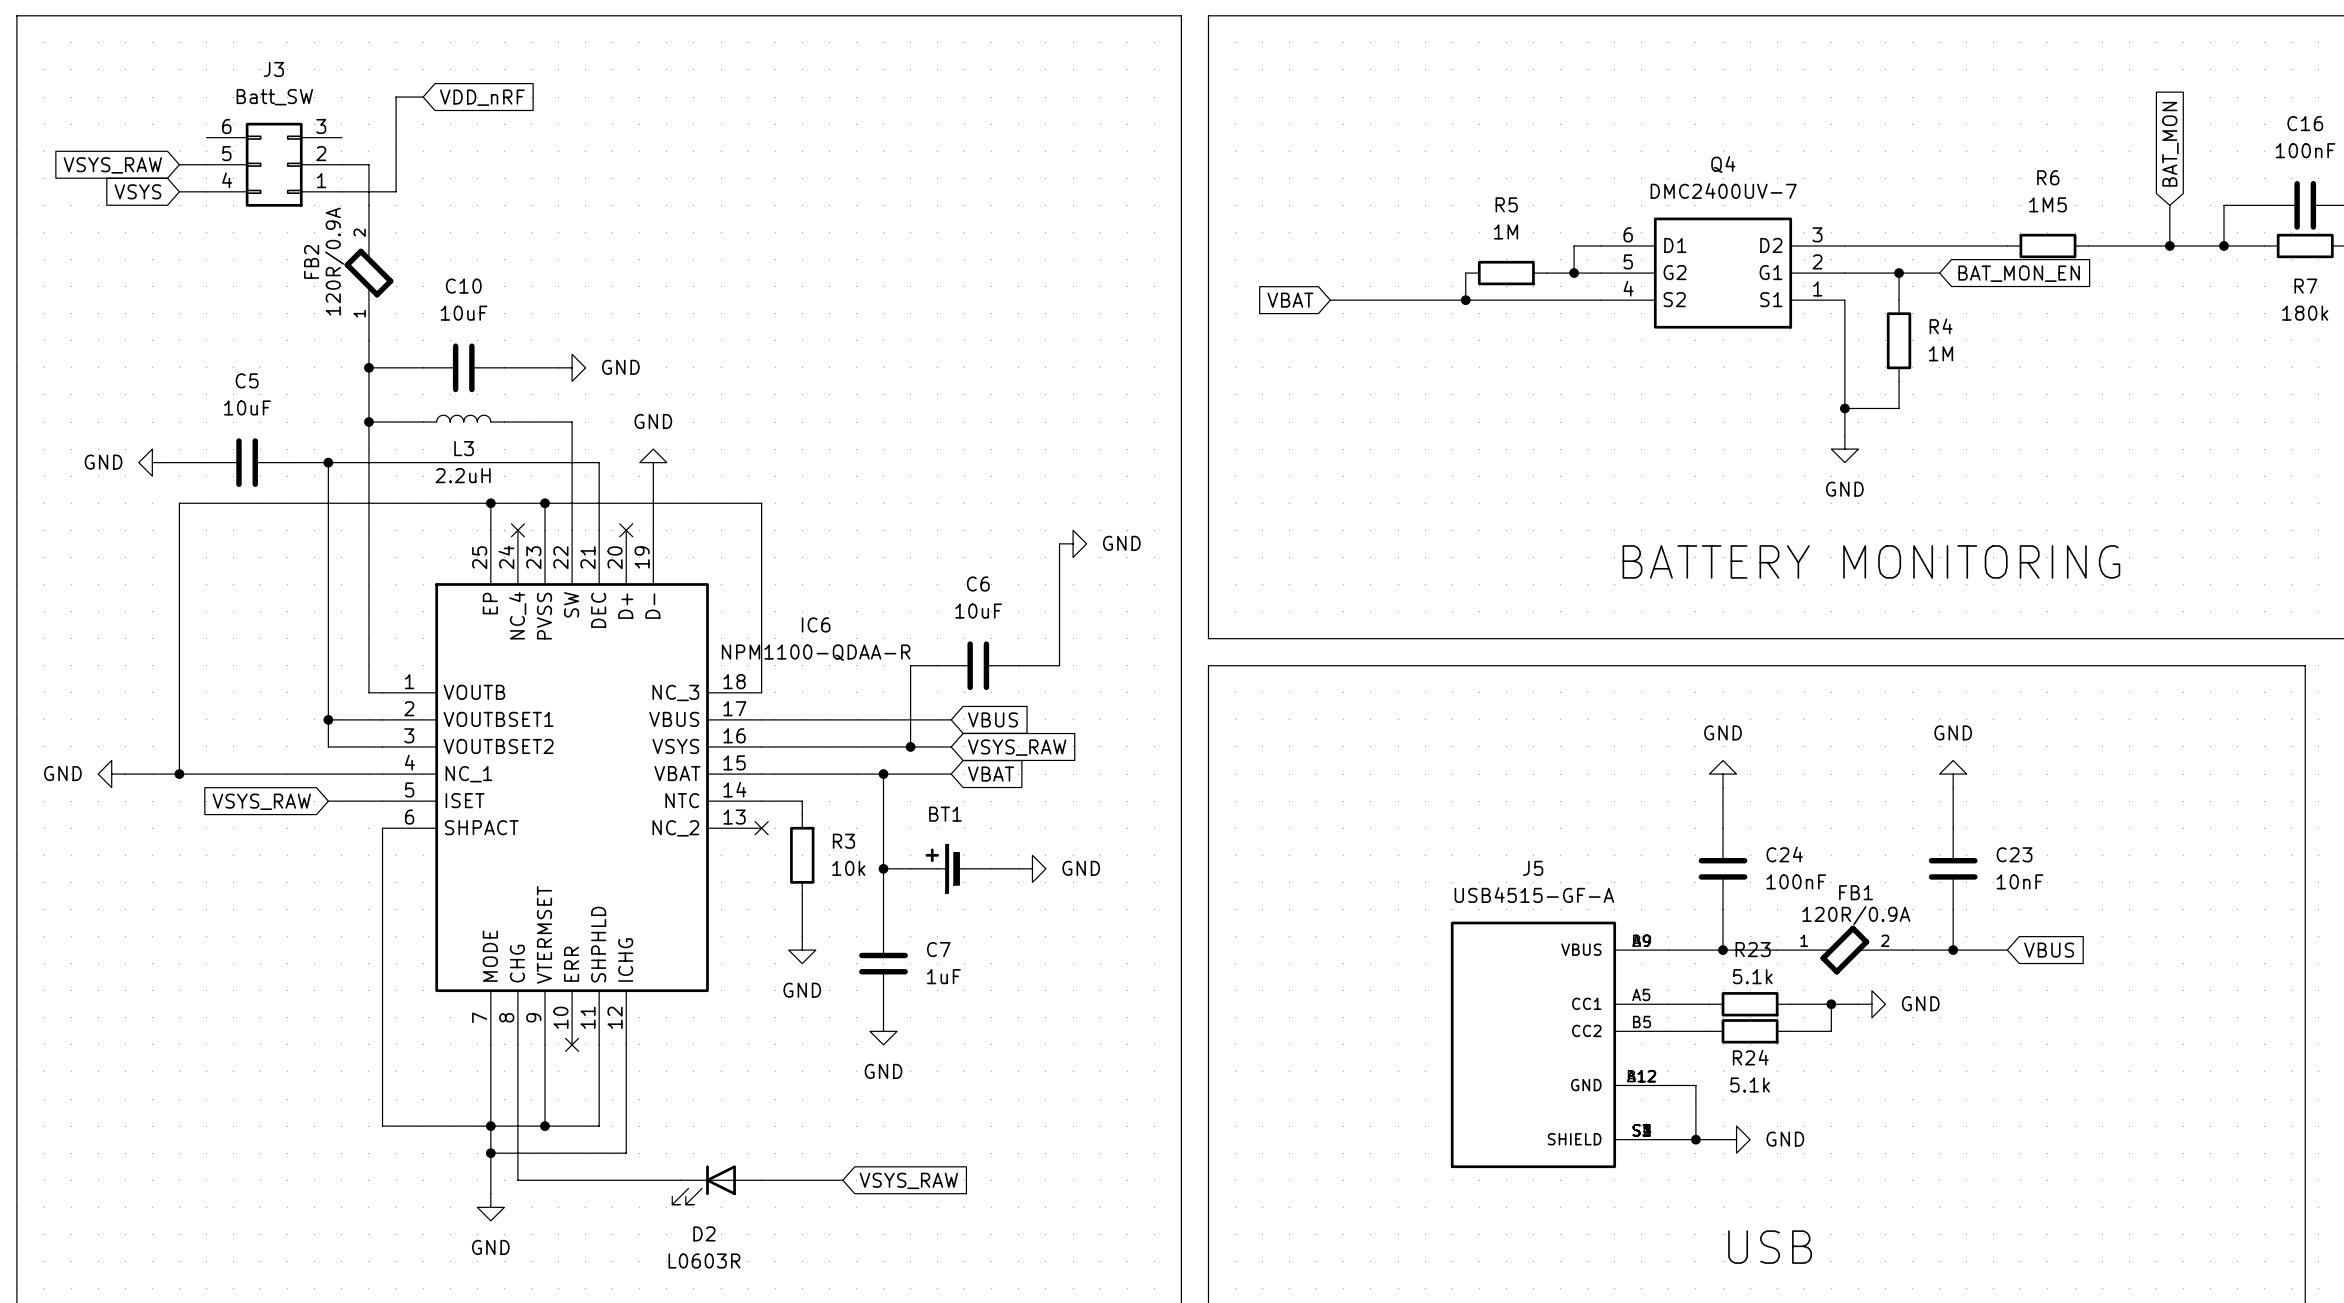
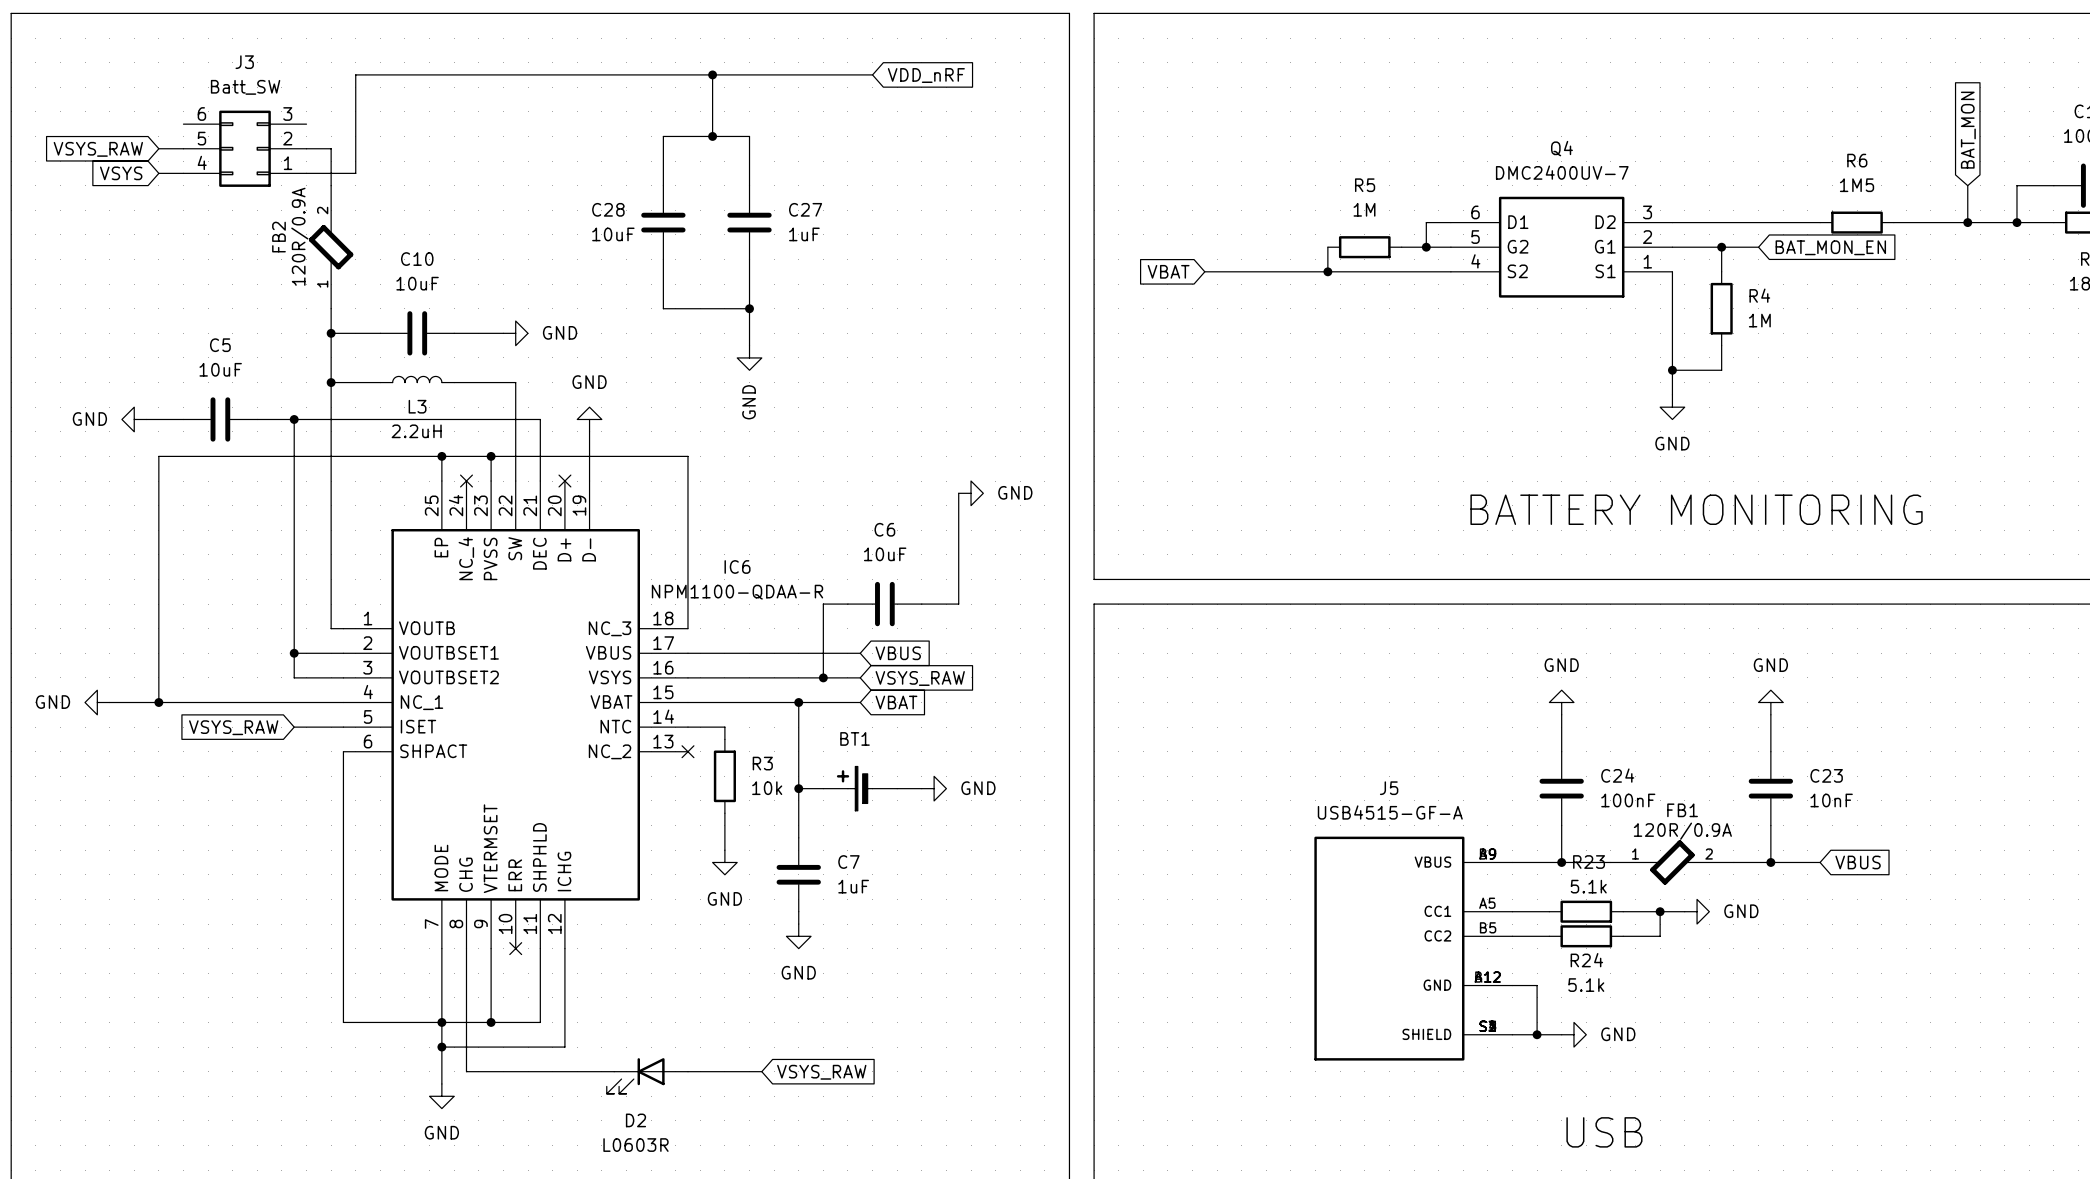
wire: none -> (712, 74) (712, 136)
junction: none -> (712, 74)
global label: none -> VDD_nRF (926, 75)
wire: (396, 97) (423, 97) -> (355, 87) (355, 74) (872, 74)
global label: VDD_nRF (482, 97) -> none
junction: none -> (712, 136)
wire: none -> (663, 185) (663, 136) (749, 136) (749, 185)
C28: none -> 10uF (663, 222)
C27: none -> 1uF (749, 222)
wire: none -> (663, 259) (663, 308) (749, 308)
wire: none -> (749, 259) (749, 345)
junction: none -> (749, 308)
power symbol: none -> GND (749, 357)

